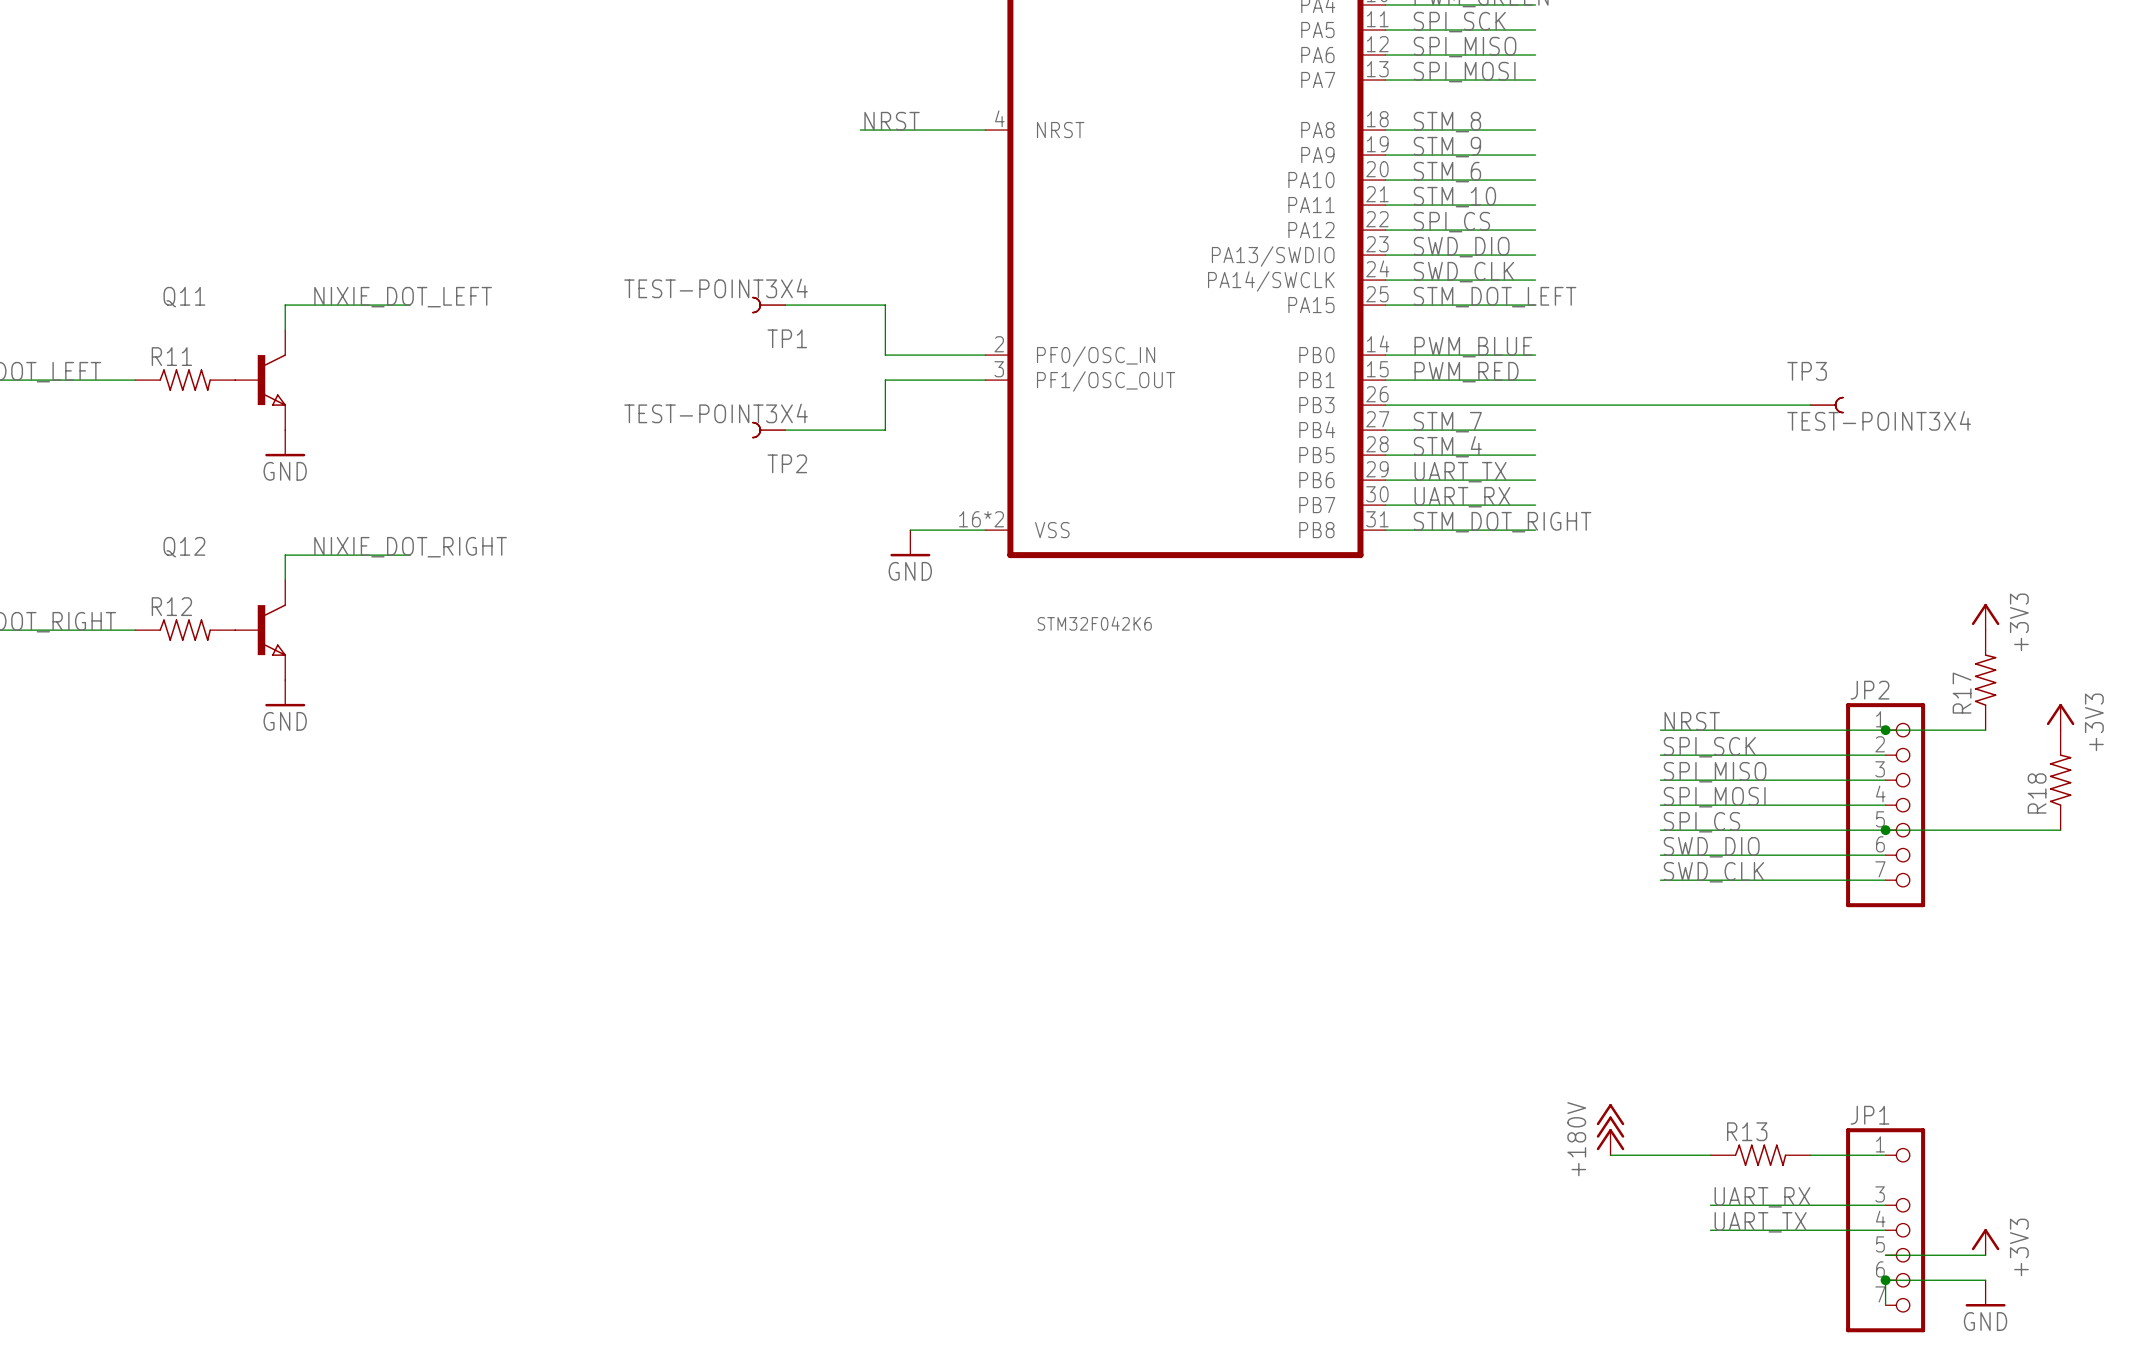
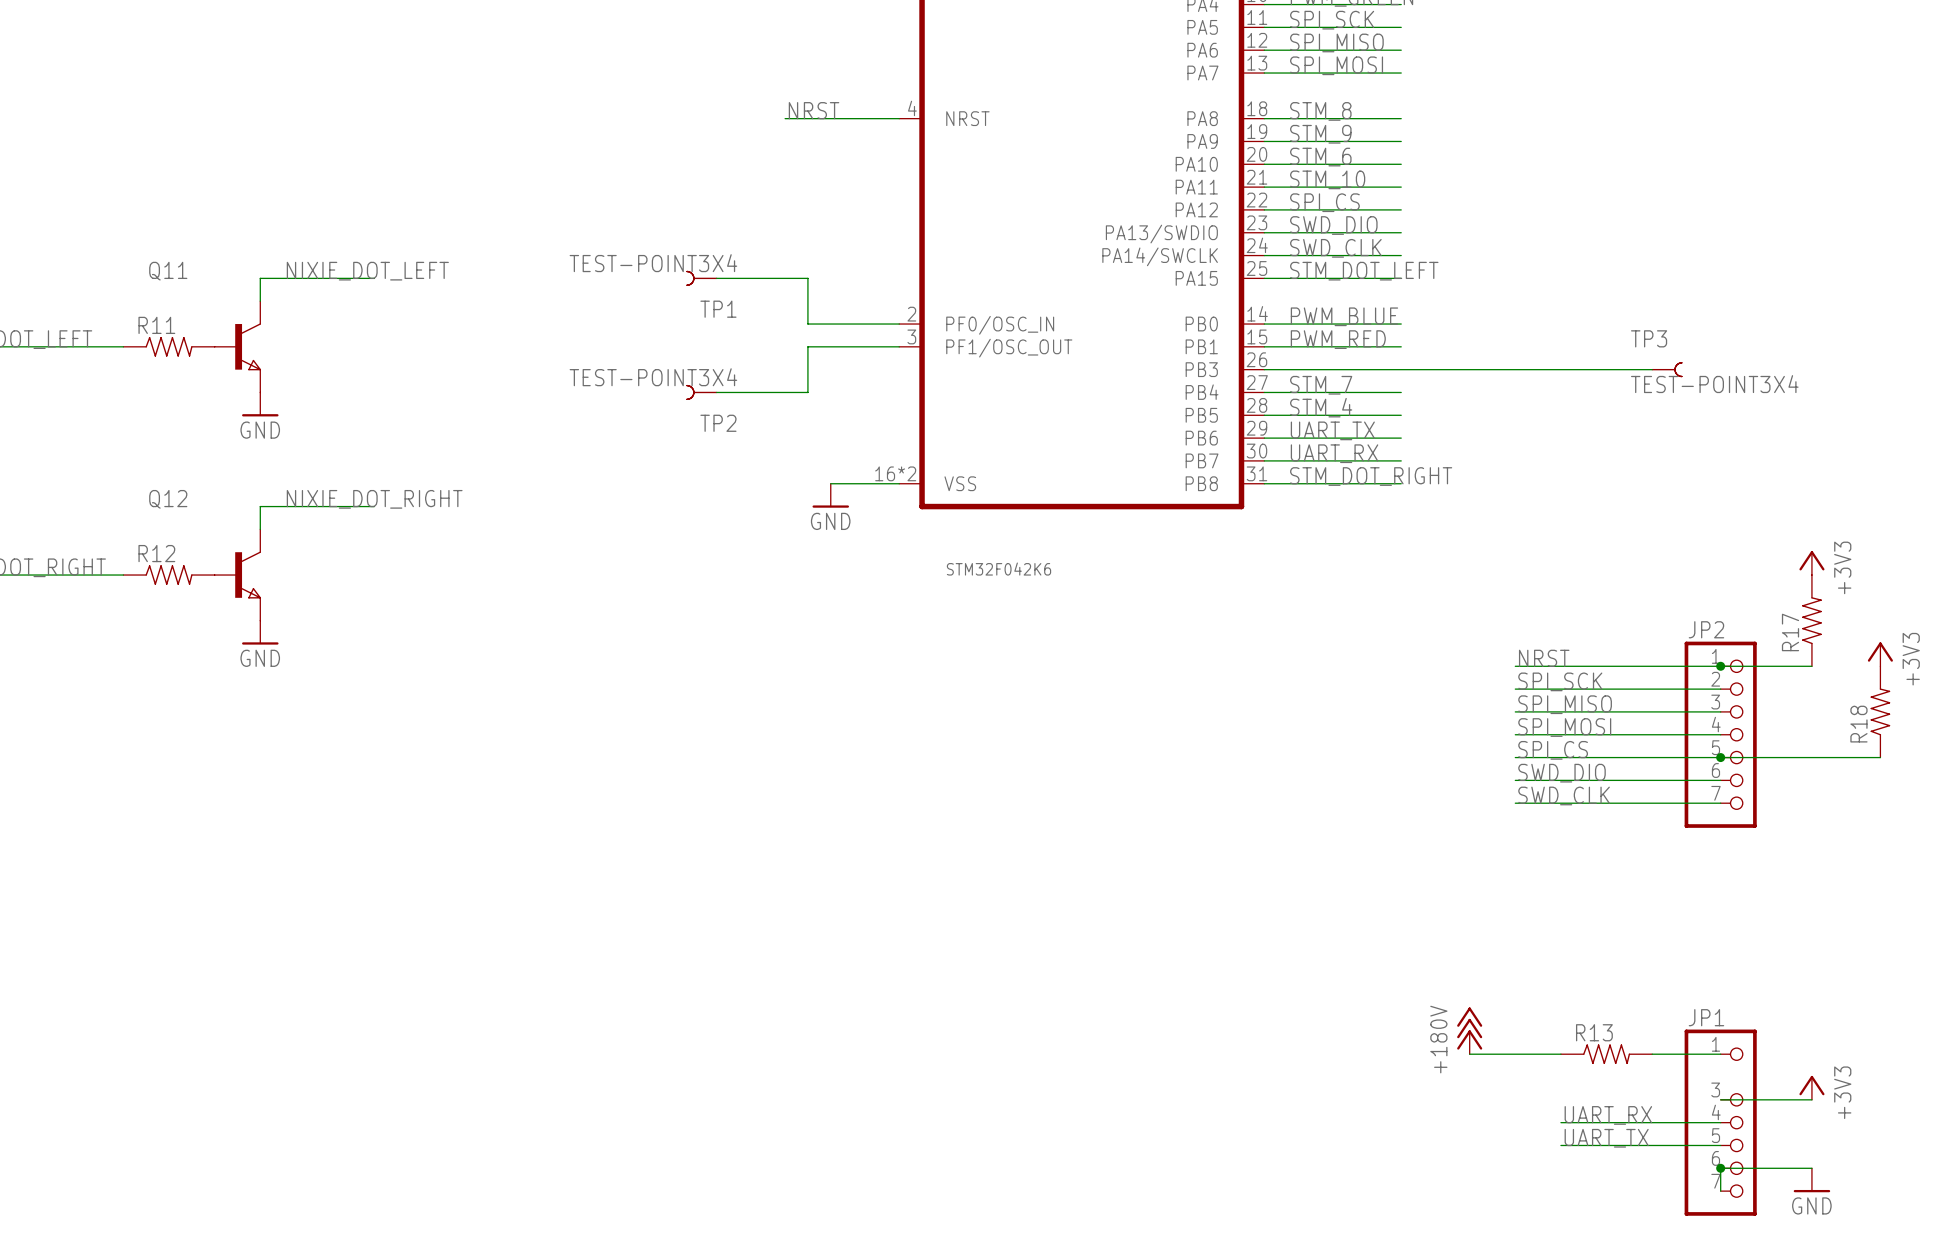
label: UART_RX (1762, 1197) -> none
wire: (1710, 1205) (1885, 1205) -> (1811, 1099) (1720, 1099)
label: UART_TX (1760, 1222) -> UART_RX (1608, 1115)
power symbol position: +3V3 (1985, 1242) -> +3V3 (1811, 1087)
label: none -> UART_TX (1606, 1138)
wire: (1885, 1255) (1985, 1255) -> (1720, 1145) (1560, 1145)

